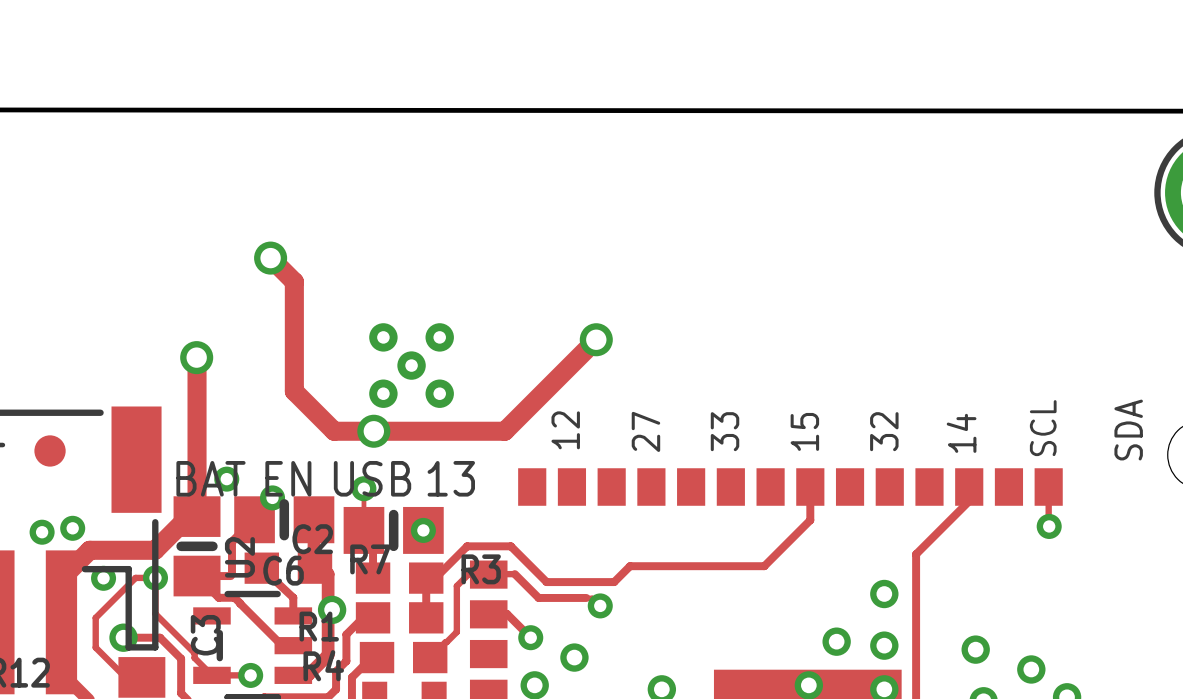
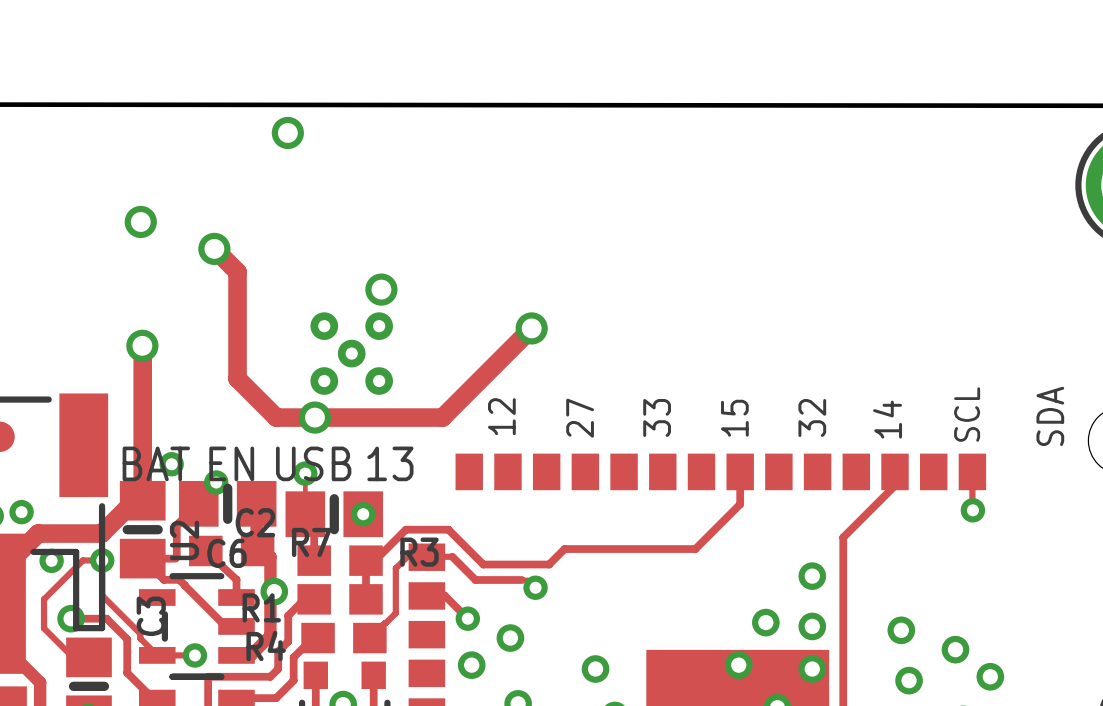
via: none -> (287, 132)
via: none -> (140, 221)
via: none -> (381, 289)

